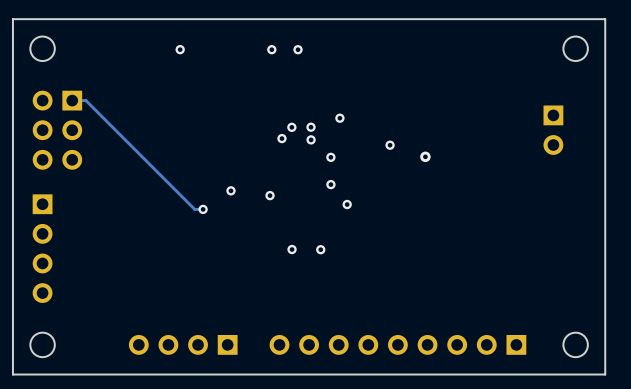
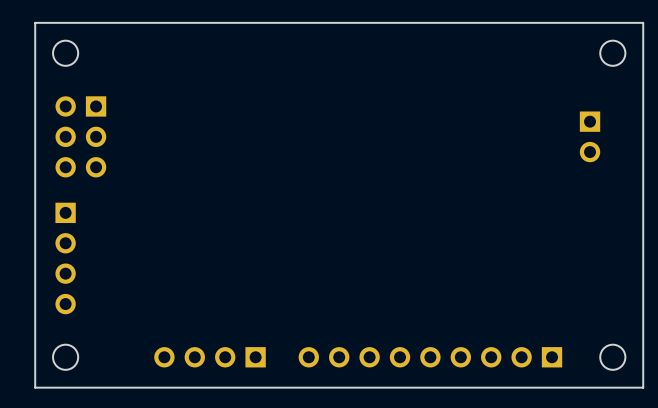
via: (180, 49) -> none
via: (271, 49) -> none
via: (298, 49) -> none
track: (72, 100) (85, 100) (194, 209) (203, 209) -> none
via: (339, 118) -> none
via: (291, 127) -> none
via: (311, 127) -> none
via: (281, 138) -> none
via: (311, 139) -> none
via: (390, 145) -> none
via: (425, 156) -> none
via: (330, 157) -> none
via: (330, 184) -> none
via: (231, 190) -> none
via: (270, 195) -> none
via: (347, 204) -> none
via: (203, 209) -> none
via: (292, 249) -> none
via: (320, 249) -> none

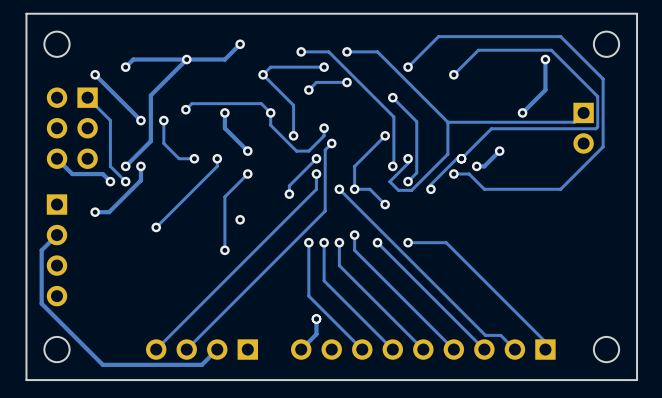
track: none -> (240, 44) (224, 59) (133, 59) (125, 67)
via: none -> (240, 44)
track: none -> (301, 51) (328, 51) (393, 116) (392, 166)
via: none -> (301, 51)
track: none -> (347, 51) (377, 51) (447, 122)
via: none -> (347, 51)
track: none -> (186, 59) (150, 95) (150, 141) (125, 166)
via: none -> (186, 59)
track: none -> (545, 59) (545, 90) (522, 112)
via: none -> (545, 59)
via: none -> (125, 67)
track: none -> (324, 67) (270, 67) (263, 74) (293, 105) (293, 135)
via: none -> (324, 67)
track: none -> (408, 67) (438, 36) (560, 36) (603, 79) (603, 146) (560, 189) (484, 189) (469, 174) (453, 174)
via: none -> (408, 67)
track: none -> (95, 74) (140, 120)
via: none -> (95, 74)
via: none -> (263, 74)
track: none -> (453, 74) (478, 50) (551, 50) (597, 96) (597, 127) (596, 128) (491, 128) (461, 158) (456, 158) (430, 184) (430, 189)
via: none -> (453, 74)
track: none -> (347, 82) (316, 82) (308, 90)
via: none -> (347, 82)
via: none -> (308, 90)
track: none -> (87, 97) (110, 120) (110, 166) (125, 181)
track: none -> (392, 97) (416, 121) (416, 172) (408, 181)
via: none -> (392, 97)
track: none -> (185, 109) (191, 103) (261, 103) (270, 112) (270, 125) (296, 151) (308, 151) (324, 135) (324, 128)
via: none -> (185, 109)
track: none -> (224, 112) (224, 128) (247, 151)
via: none -> (224, 112)
via: none -> (270, 112)
via: none -> (522, 112)
track: none -> (583, 112) (574, 122) (447, 122)
via: none -> (140, 120)
track: none -> (163, 120) (163, 143) (179, 158) (194, 158)
via: none -> (163, 120)
track: none -> (447, 122) (447, 154) (411, 190) (398, 190) (389, 181) (408, 163) (408, 158)
via: none -> (324, 128)
via: none -> (293, 135)
track: none -> (385, 135) (354, 166) (354, 189) (369, 189) (385, 204)
via: none -> (385, 135)
track: none -> (331, 143) (325, 150) (325, 211) (186, 349)
via: none -> (331, 143)
via: none -> (247, 151)
track: none -> (499, 151) (484, 166) (476, 166)
via: none -> (499, 151)
track: none -> (56, 158) (72, 174) (102, 174) (110, 181)
via: none -> (194, 158)
track: none -> (217, 158) (217, 166) (156, 227)
via: none -> (217, 158)
track: none -> (316, 158) (289, 185) (289, 194)
via: none -> (316, 158)
via: none -> (408, 158)
via: none -> (461, 158)
via: none -> (125, 166)
track: none -> (140, 166) (140, 180) (109, 212) (95, 212)
via: none -> (140, 166)
via: none -> (392, 166)
via: none -> (476, 166)
track: none -> (247, 174) (224, 196) (224, 250)
via: none -> (247, 174)
track: none -> (316, 174) (316, 189) (156, 349)
via: none -> (316, 174)
via: none -> (453, 174)
via: none -> (110, 181)
via: none -> (125, 181)
via: none -> (408, 181)
track: none -> (339, 189) (485, 335) (500, 335) (514, 349)
via: none -> (339, 189)
via: none -> (354, 189)
via: none -> (430, 189)
via: none -> (289, 194)
via: none -> (385, 204)
via: none -> (95, 212)
via: none -> (240, 219)
via: none -> (156, 227)
track: none -> (56, 235) (41, 250) (41, 303) (102, 364) (201, 364) (217, 349)
track: none -> (354, 235) (354, 250) (453, 349)
via: none -> (354, 235)
track: none -> (308, 242) (308, 296) (362, 349)
via: none -> (308, 242)
track: none -> (324, 242) (324, 280) (392, 349)
via: none -> (324, 242)
track: none -> (339, 242) (339, 265) (423, 349) (430, 349)
via: none -> (339, 242)
track: none -> (377, 242) (484, 349) (476, 349)
via: none -> (377, 242)
track: none -> (408, 242) (446, 242) (553, 349) (545, 349)
via: none -> (408, 242)
via: none -> (224, 250)
track: none -> (316, 319) (316, 334) (301, 349)
via: none -> (316, 319)

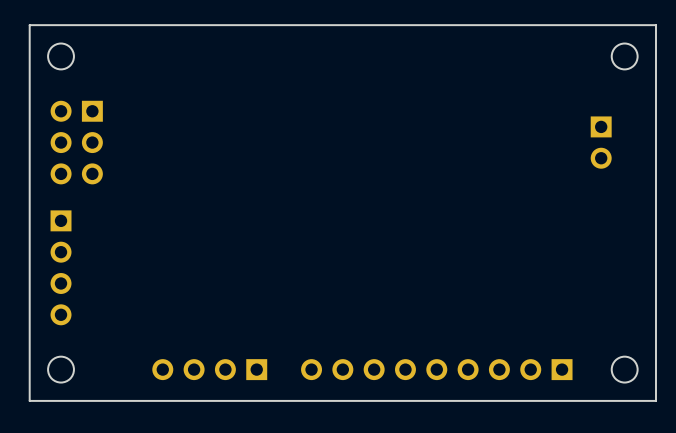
track: (240, 44) (224, 59) (133, 59) (125, 67) -> none
via: (240, 44) -> none
track: (301, 51) (328, 51) (393, 116) (392, 166) -> none
via: (301, 51) -> none
track: (347, 51) (377, 51) (447, 122) -> none
via: (347, 51) -> none
track: (186, 59) (150, 95) (150, 141) (125, 166) -> none
via: (186, 59) -> none
track: (545, 59) (545, 90) (522, 112) -> none
via: (545, 59) -> none
via: (125, 67) -> none
track: (324, 67) (270, 67) (263, 74) (293, 105) (293, 135) -> none
via: (324, 67) -> none
track: (408, 67) (438, 36) (560, 36) (603, 79) (603, 146) (560, 189) (484, 189) (469, 174) (453, 174) -> none
via: (408, 67) -> none
track: (95, 74) (140, 120) -> none
via: (95, 74) -> none
via: (263, 74) -> none
track: (453, 74) (478, 50) (551, 50) (597, 96) (597, 127) (596, 128) (491, 128) (461, 158) (456, 158) (430, 184) (430, 189) -> none
via: (453, 74) -> none
track: (347, 82) (316, 82) (308, 90) -> none
via: (347, 82) -> none
via: (308, 90) -> none
track: (87, 97) (110, 120) (110, 166) (125, 181) -> none
track: (392, 97) (416, 121) (416, 172) (408, 181) -> none
via: (392, 97) -> none
track: (185, 109) (191, 103) (261, 103) (270, 112) (270, 125) (296, 151) (308, 151) (324, 135) (324, 128) -> none
via: (185, 109) -> none
track: (224, 112) (224, 128) (247, 151) -> none
via: (224, 112) -> none
via: (270, 112) -> none
via: (522, 112) -> none
track: (583, 112) (574, 122) (447, 122) -> none
via: (140, 120) -> none
track: (163, 120) (163, 143) (179, 158) (194, 158) -> none
via: (163, 120) -> none
track: (447, 122) (447, 154) (411, 190) (398, 190) (389, 181) (408, 163) (408, 158) -> none
via: (324, 128) -> none
via: (293, 135) -> none
track: (385, 135) (354, 166) (354, 189) (369, 189) (385, 204) -> none
via: (385, 135) -> none
track: (331, 143) (325, 150) (325, 211) (186, 349) -> none
via: (331, 143) -> none
via: (247, 151) -> none
track: (499, 151) (484, 166) (476, 166) -> none
via: (499, 151) -> none
track: (56, 158) (72, 174) (102, 174) (110, 181) -> none
via: (194, 158) -> none
track: (217, 158) (217, 166) (156, 227) -> none
via: (217, 158) -> none
track: (316, 158) (289, 185) (289, 194) -> none
via: (316, 158) -> none
via: (408, 158) -> none
via: (461, 158) -> none
via: (125, 166) -> none
track: (140, 166) (140, 180) (109, 212) (95, 212) -> none
via: (140, 166) -> none
via: (392, 166) -> none
via: (476, 166) -> none
track: (247, 174) (224, 196) (224, 250) -> none
via: (247, 174) -> none
track: (316, 174) (316, 189) (156, 349) -> none
via: (316, 174) -> none
via: (453, 174) -> none
via: (110, 181) -> none
via: (125, 181) -> none
via: (408, 181) -> none
track: (339, 189) (485, 335) (500, 335) (514, 349) -> none
via: (339, 189) -> none
via: (354, 189) -> none
via: (430, 189) -> none
via: (289, 194) -> none
via: (385, 204) -> none
via: (95, 212) -> none
via: (240, 219) -> none
via: (156, 227) -> none
track: (56, 235) (41, 250) (41, 303) (102, 364) (201, 364) (217, 349) -> none
track: (354, 235) (354, 250) (453, 349) -> none
via: (354, 235) -> none
track: (308, 242) (308, 296) (362, 349) -> none
via: (308, 242) -> none
track: (324, 242) (324, 280) (392, 349) -> none
via: (324, 242) -> none
track: (339, 242) (339, 265) (423, 349) (430, 349) -> none
via: (339, 242) -> none
track: (377, 242) (484, 349) (476, 349) -> none
via: (377, 242) -> none
track: (408, 242) (446, 242) (553, 349) (545, 349) -> none
via: (408, 242) -> none
via: (224, 250) -> none
track: (316, 319) (316, 334) (301, 349) -> none
via: (316, 319) -> none

